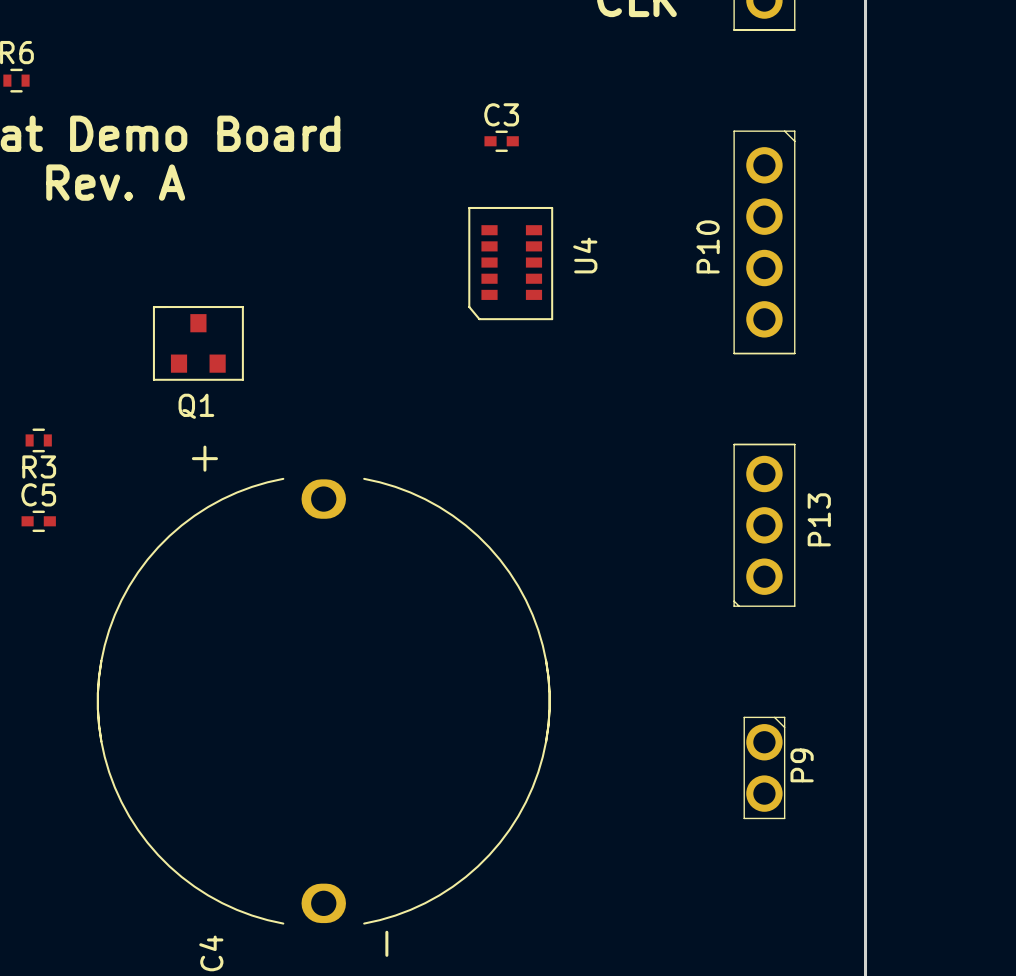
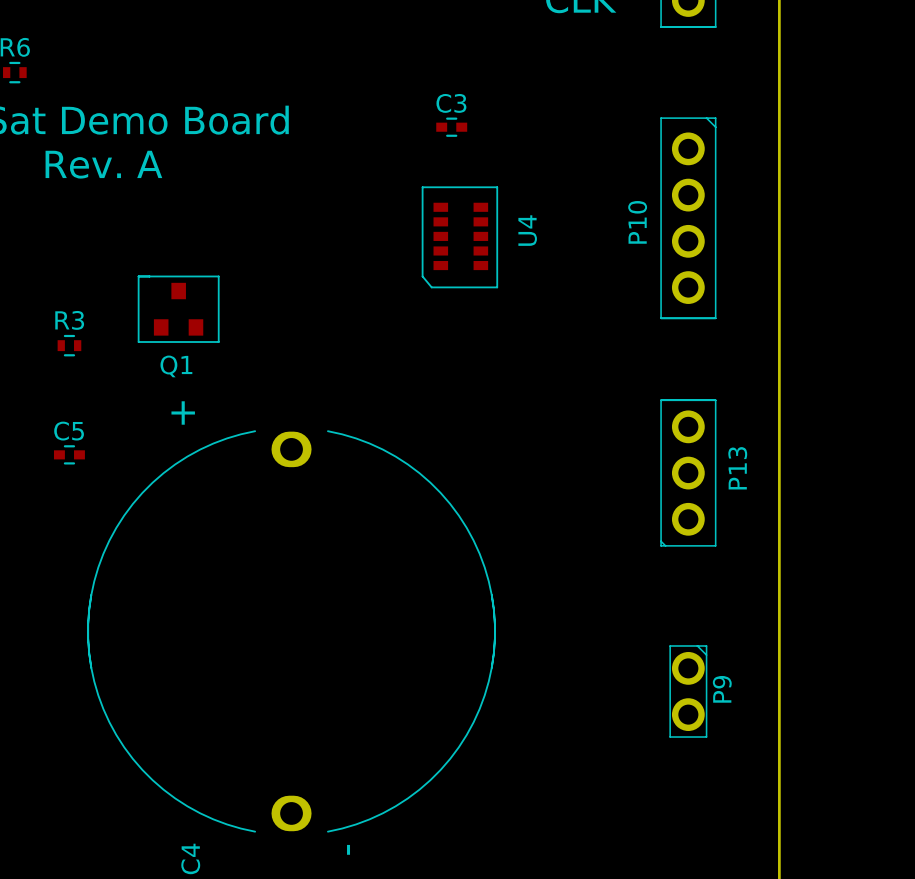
R3 position: (38, 440) -> (69, 345)
R3 name position: R3 (39, 466) -> R3 (69, 320)
C5 position: (38, 521) -> (69, 454)

